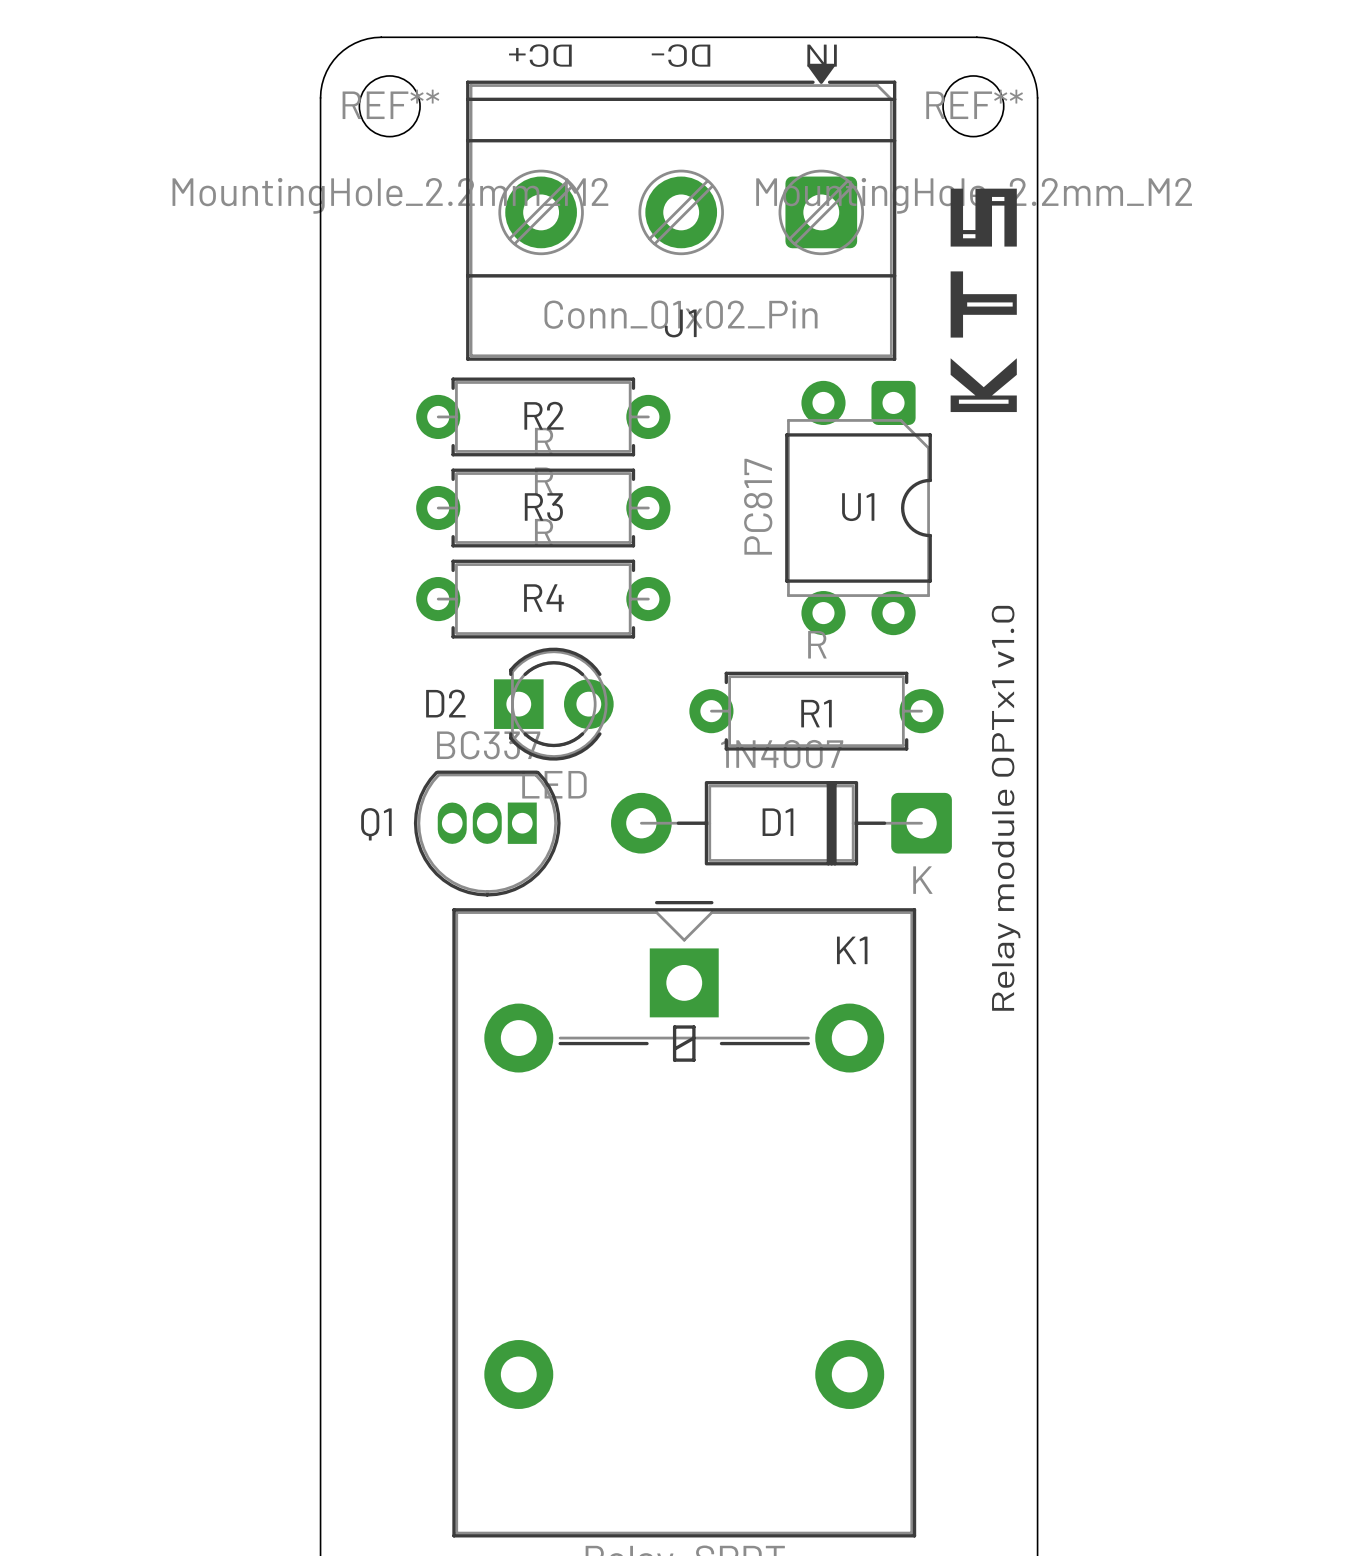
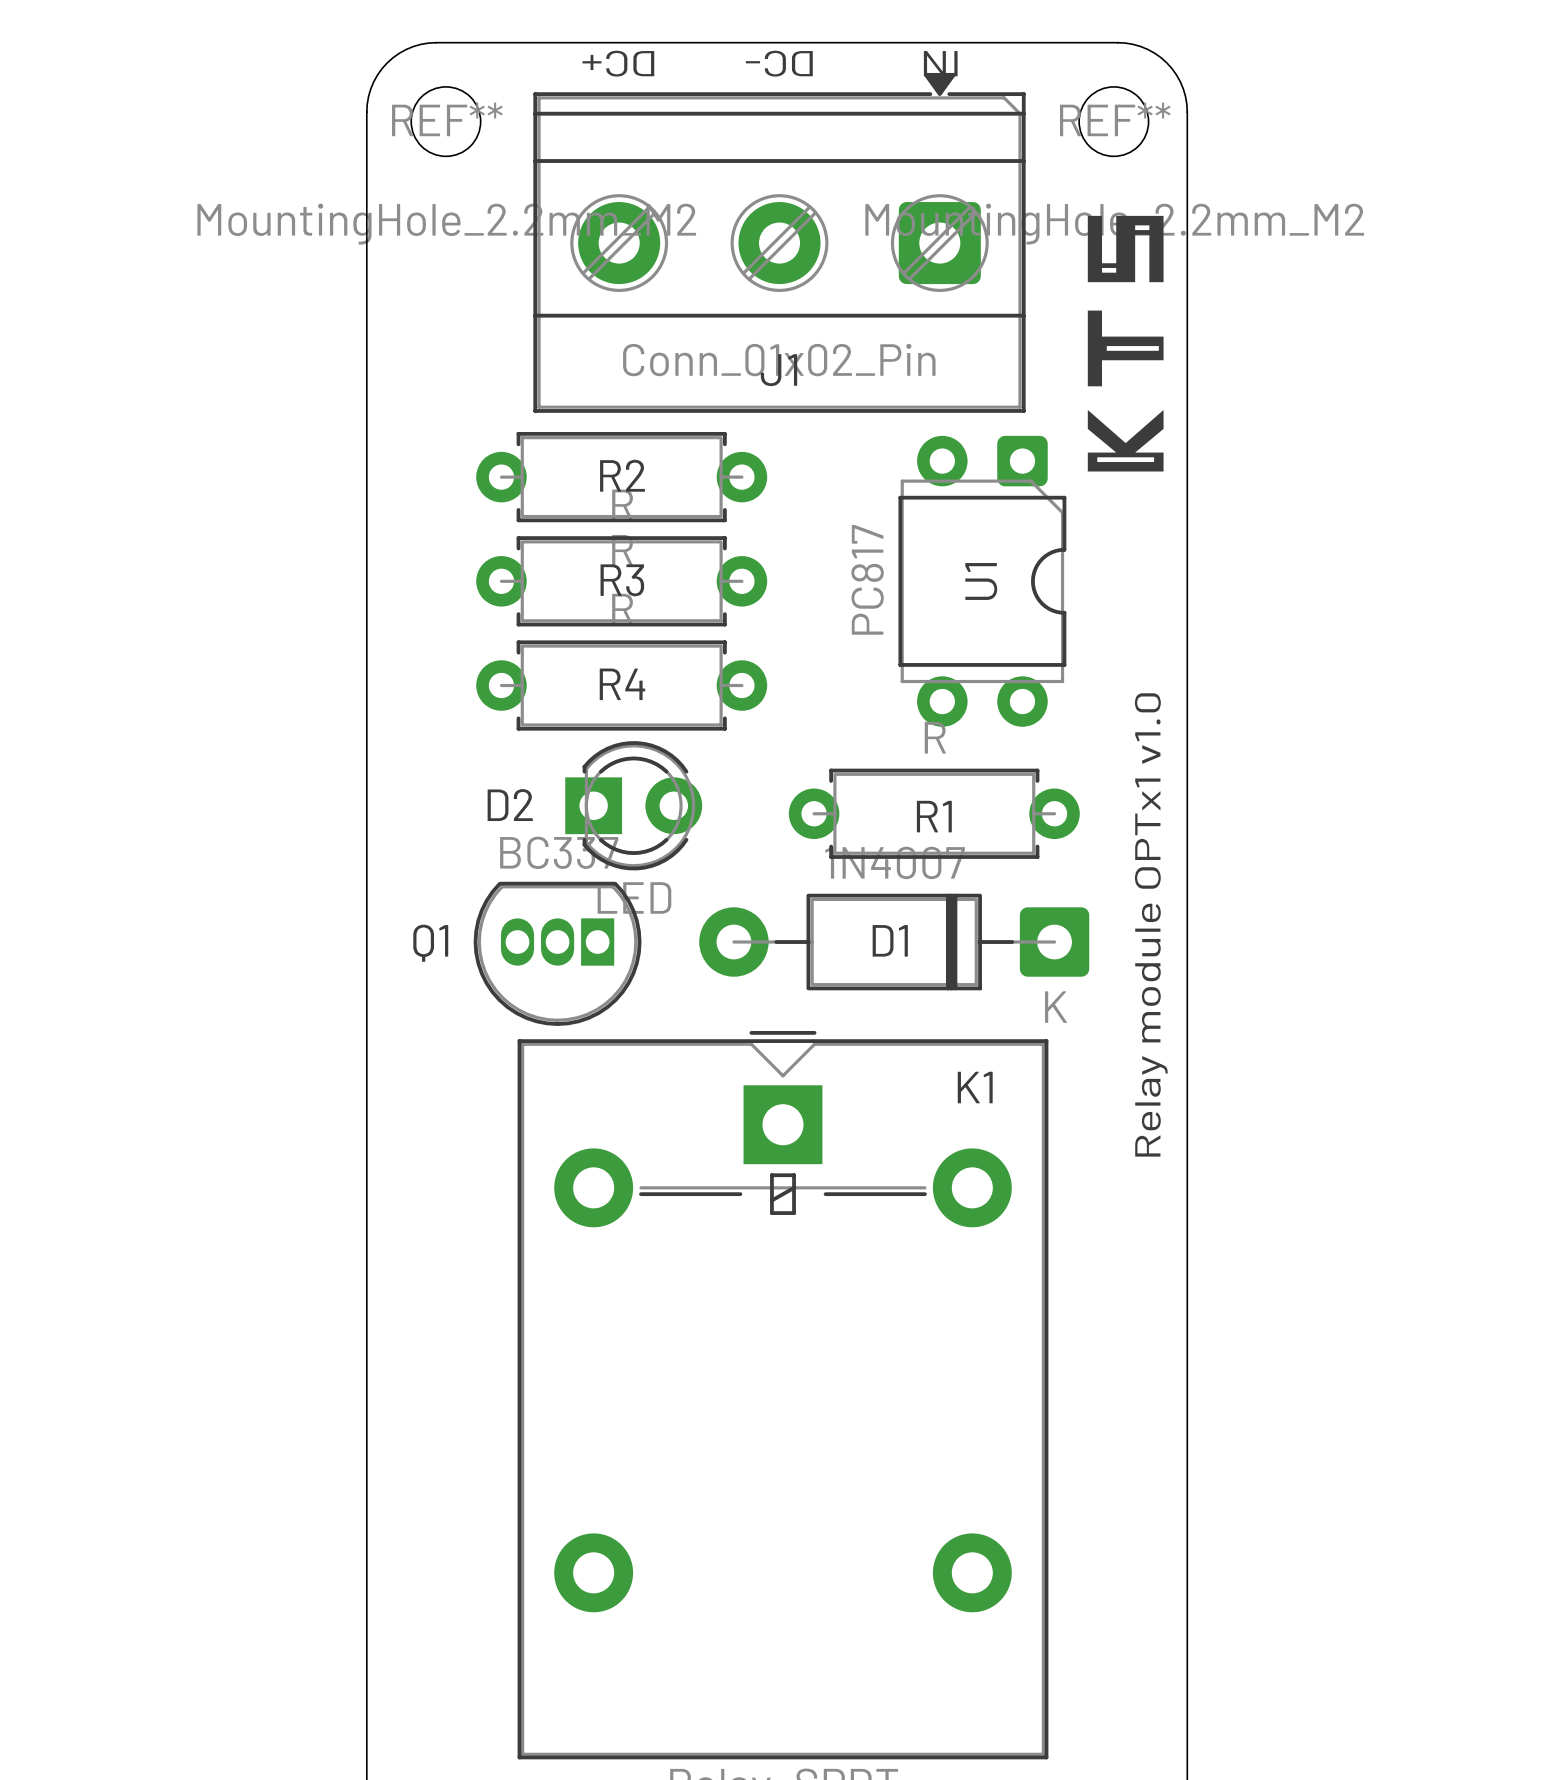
U1 name rotation: 0° (858, 507) -> 90° counterclockwise (981, 581)

